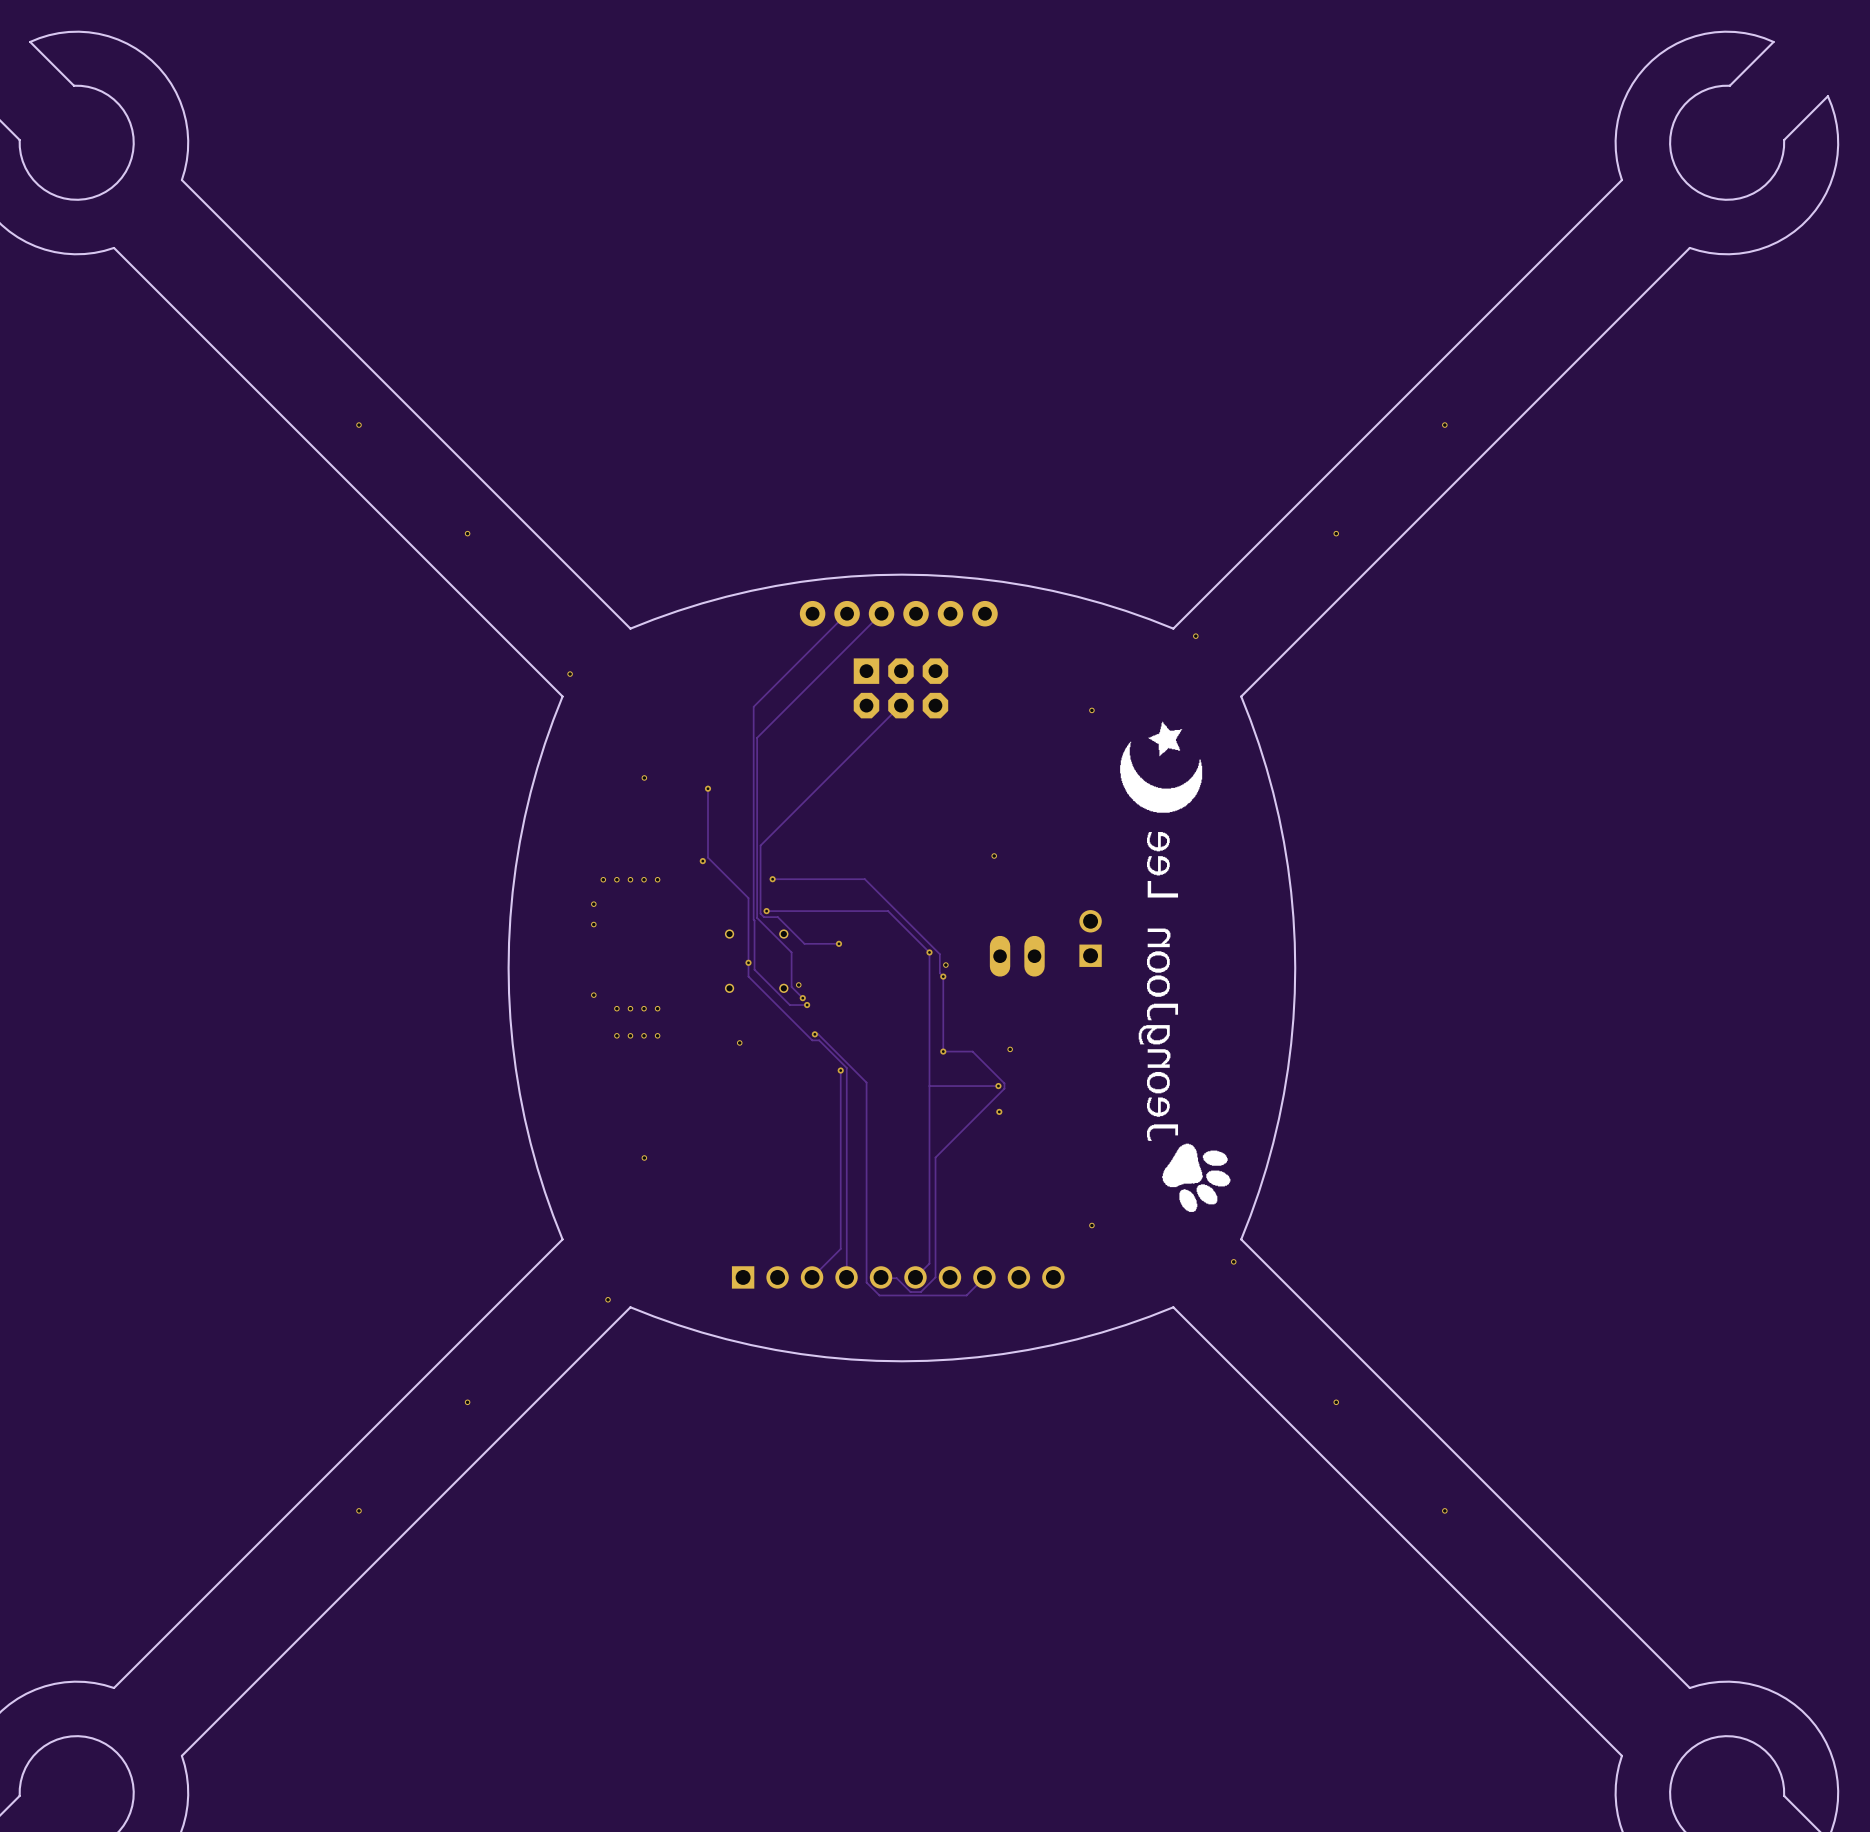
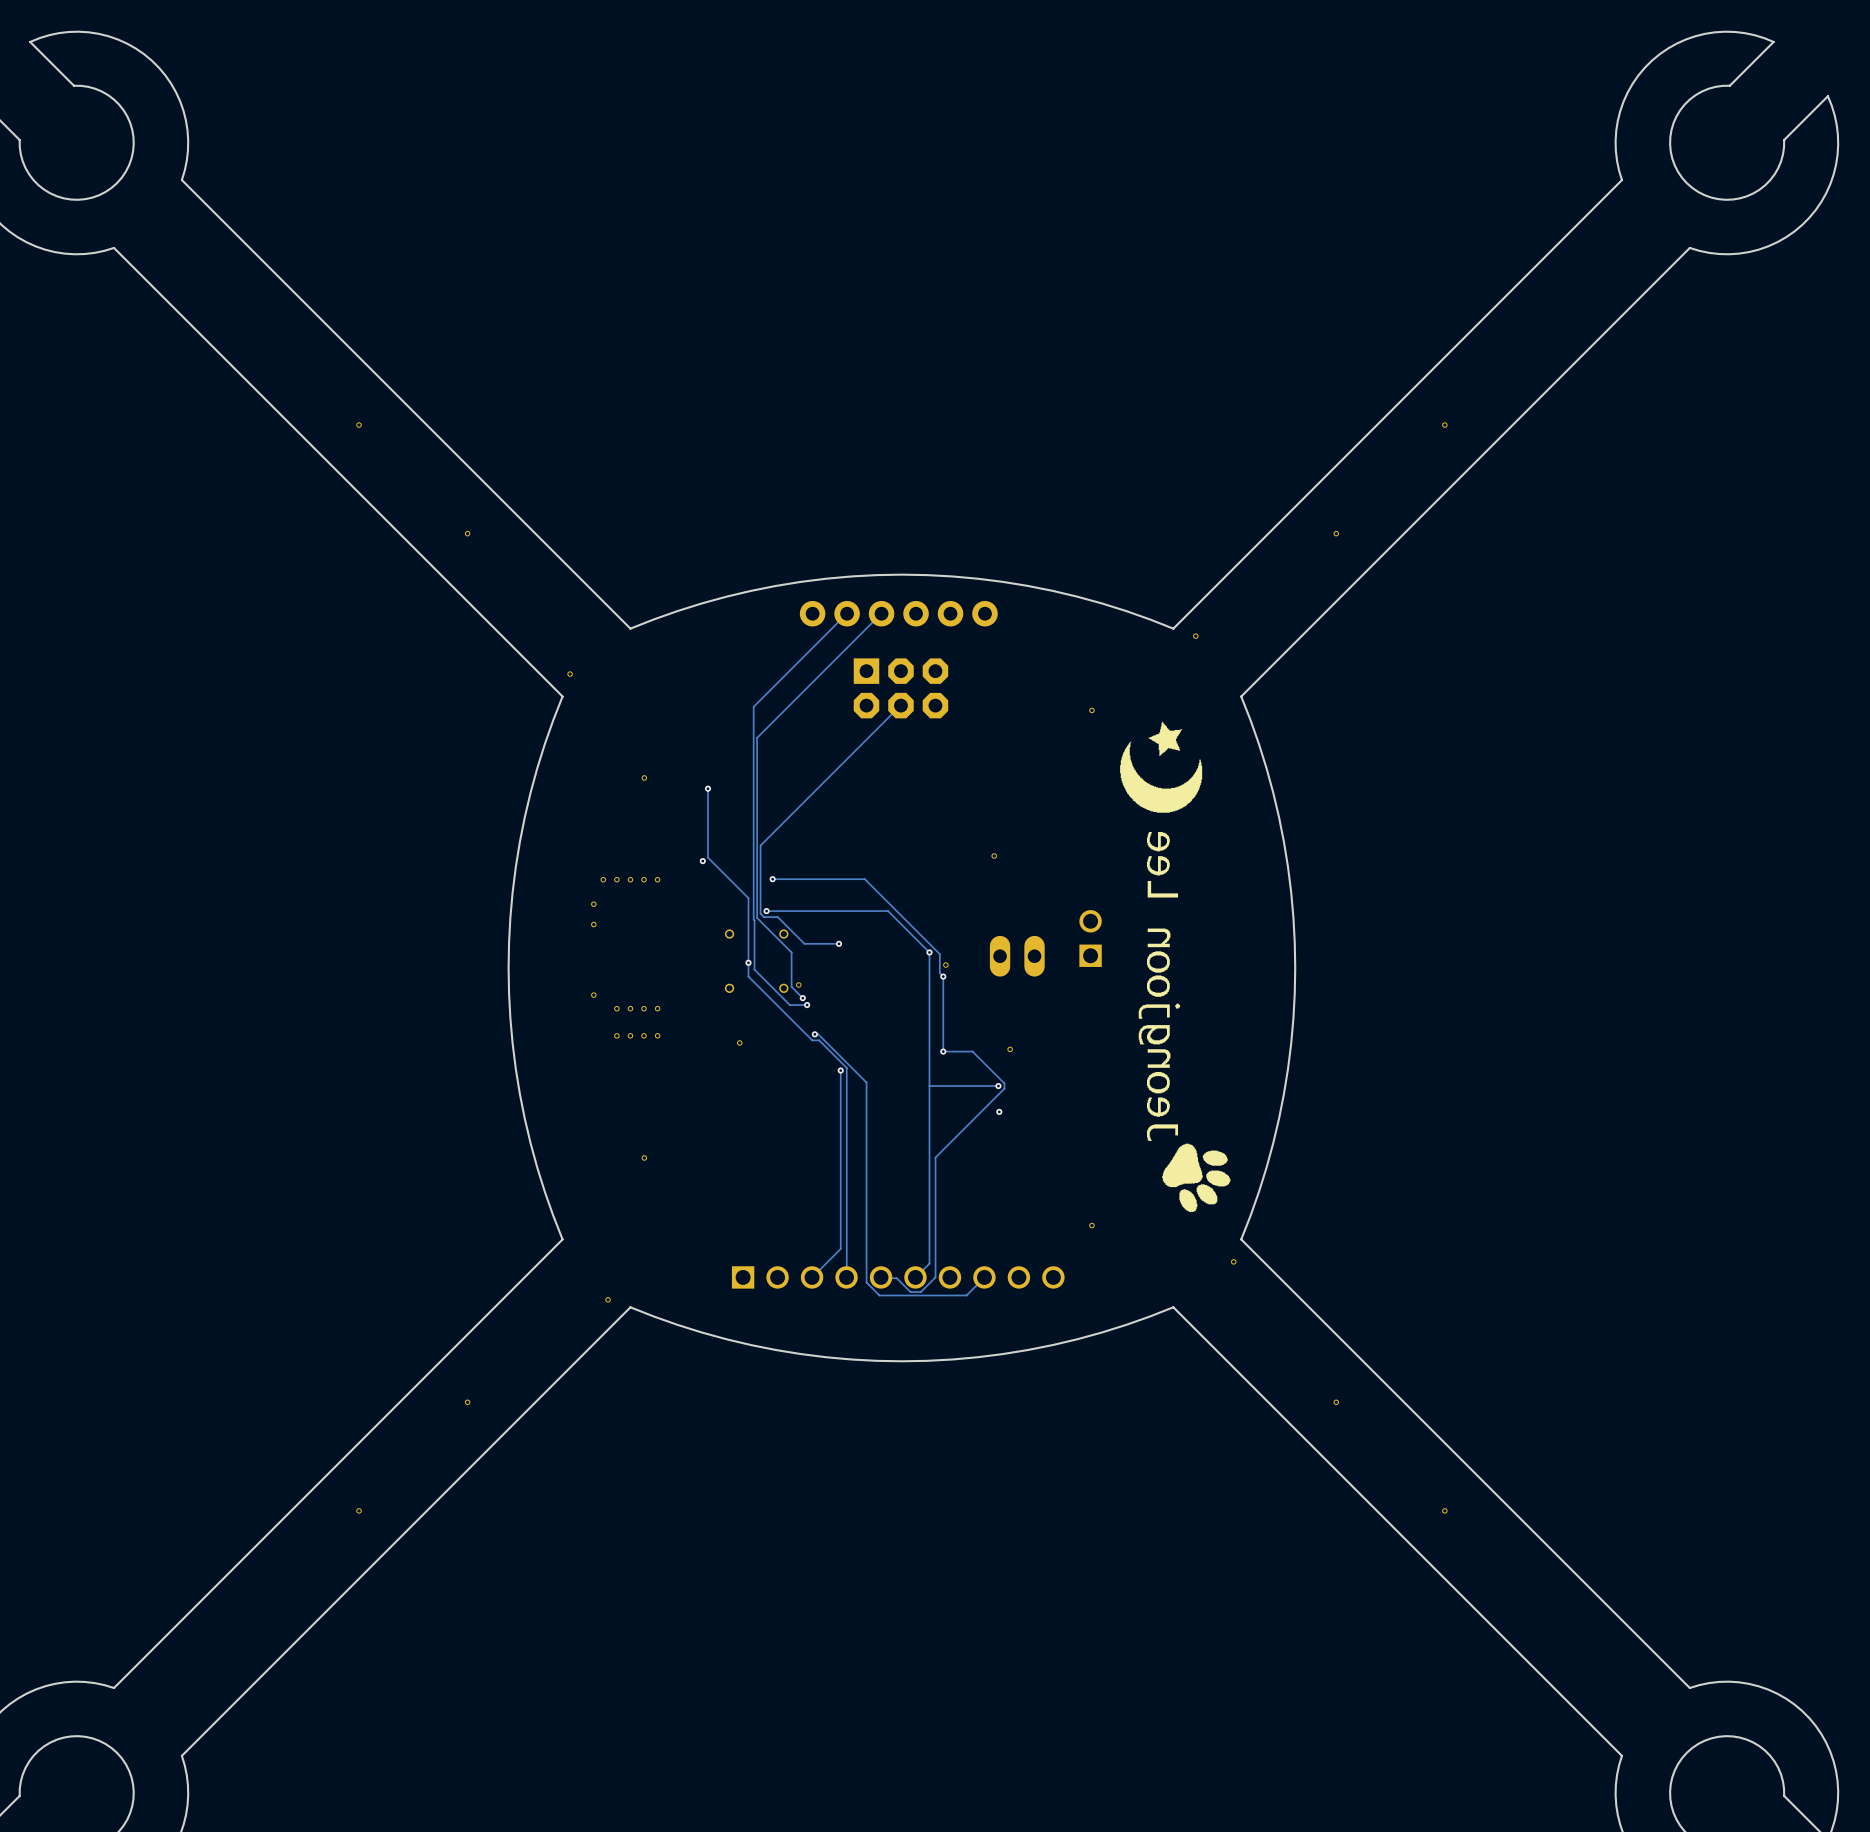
drawing shape: [1120, 721, 1231, 1212] -> [1120, 721, 1231, 1212]

